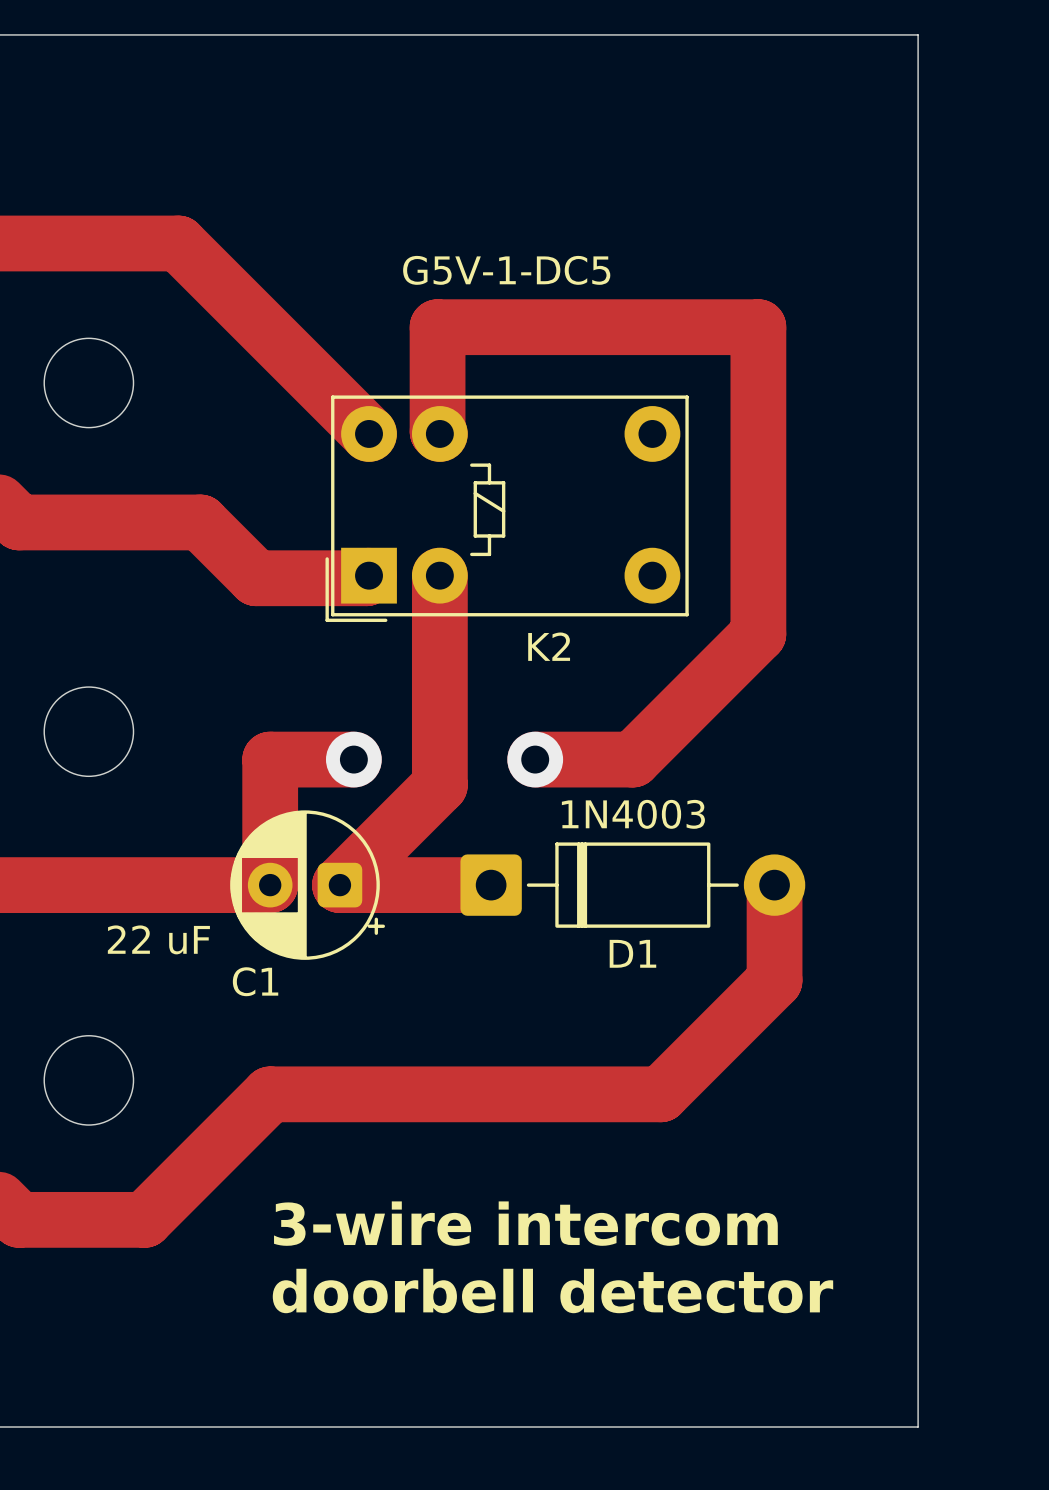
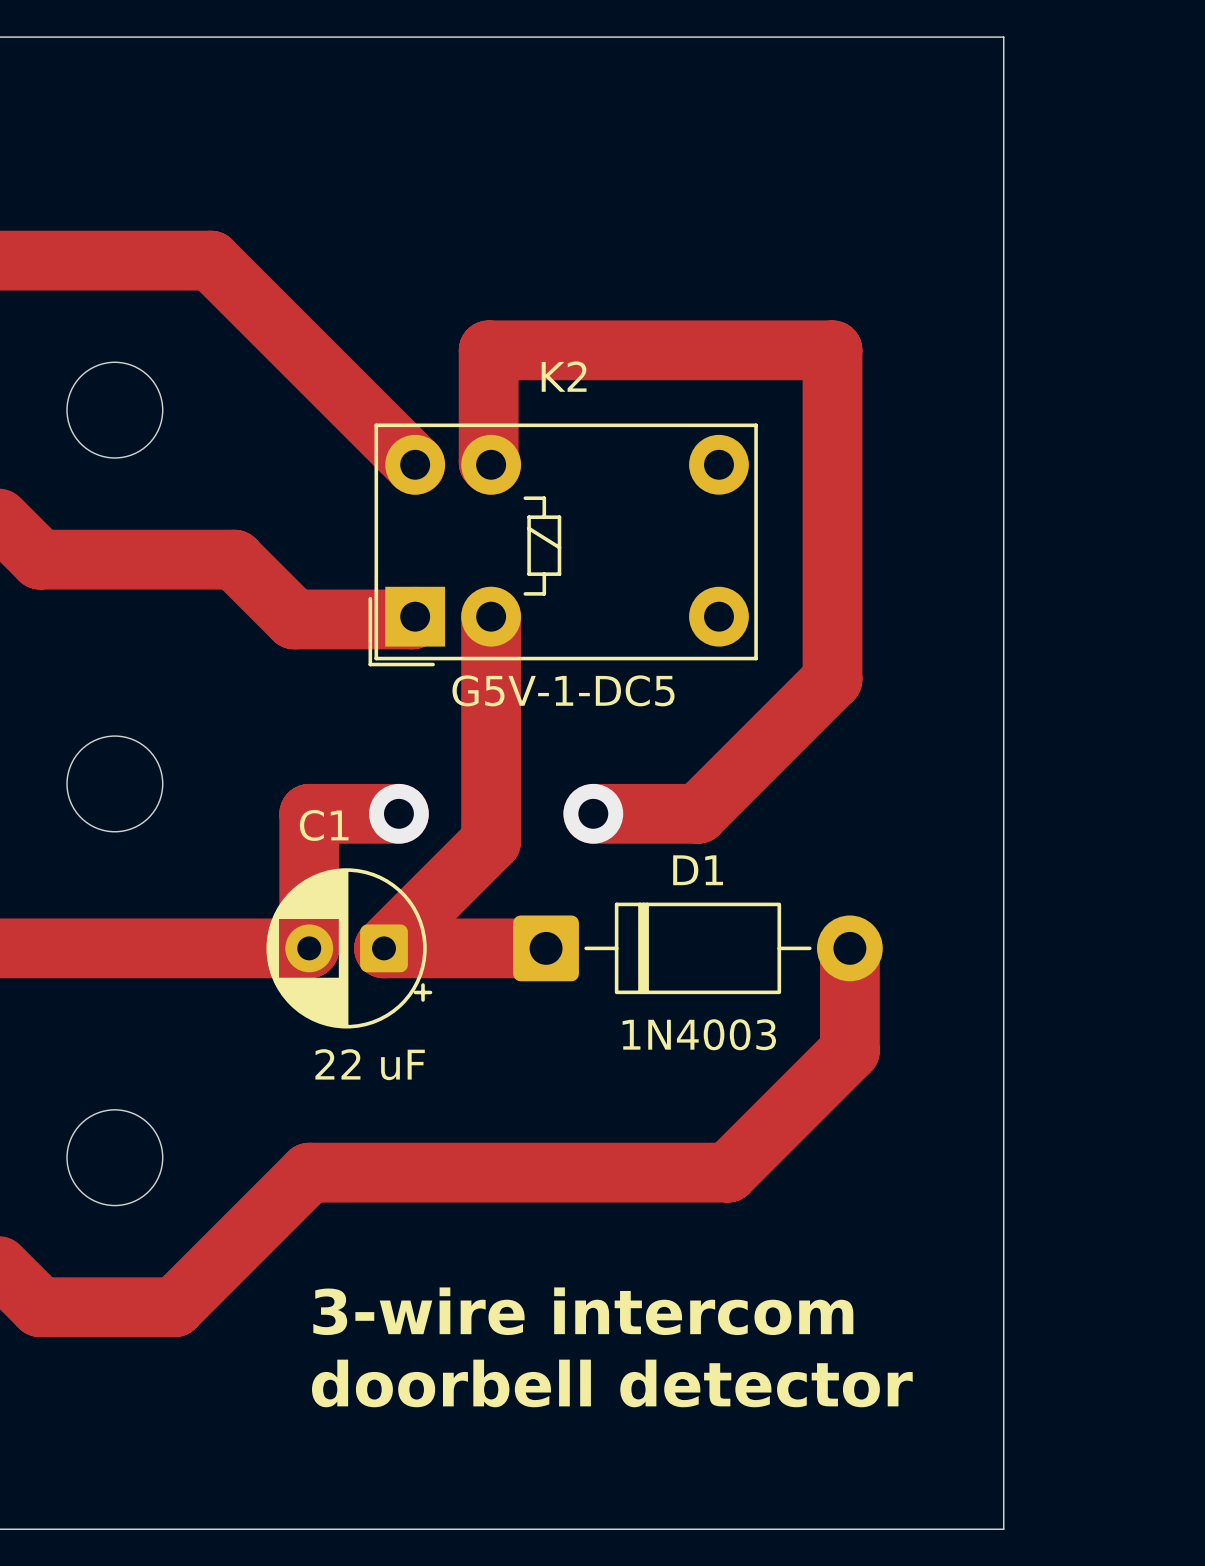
K2 value position: G5V-1-DC5 (506, 270) -> G5V-1-DC5 (563, 690)
K2 name position: K2 (549, 646) -> K2 (564, 376)
D1 value position: 1N4003 (633, 814) -> 1N4003 (699, 1034)
C1 value position: 22 uF (158, 939) -> 22 uF (370, 1064)
D1 name position: D1 (632, 953) -> D1 (698, 870)
C1 name position: C1 (255, 981) -> C1 (324, 825)

